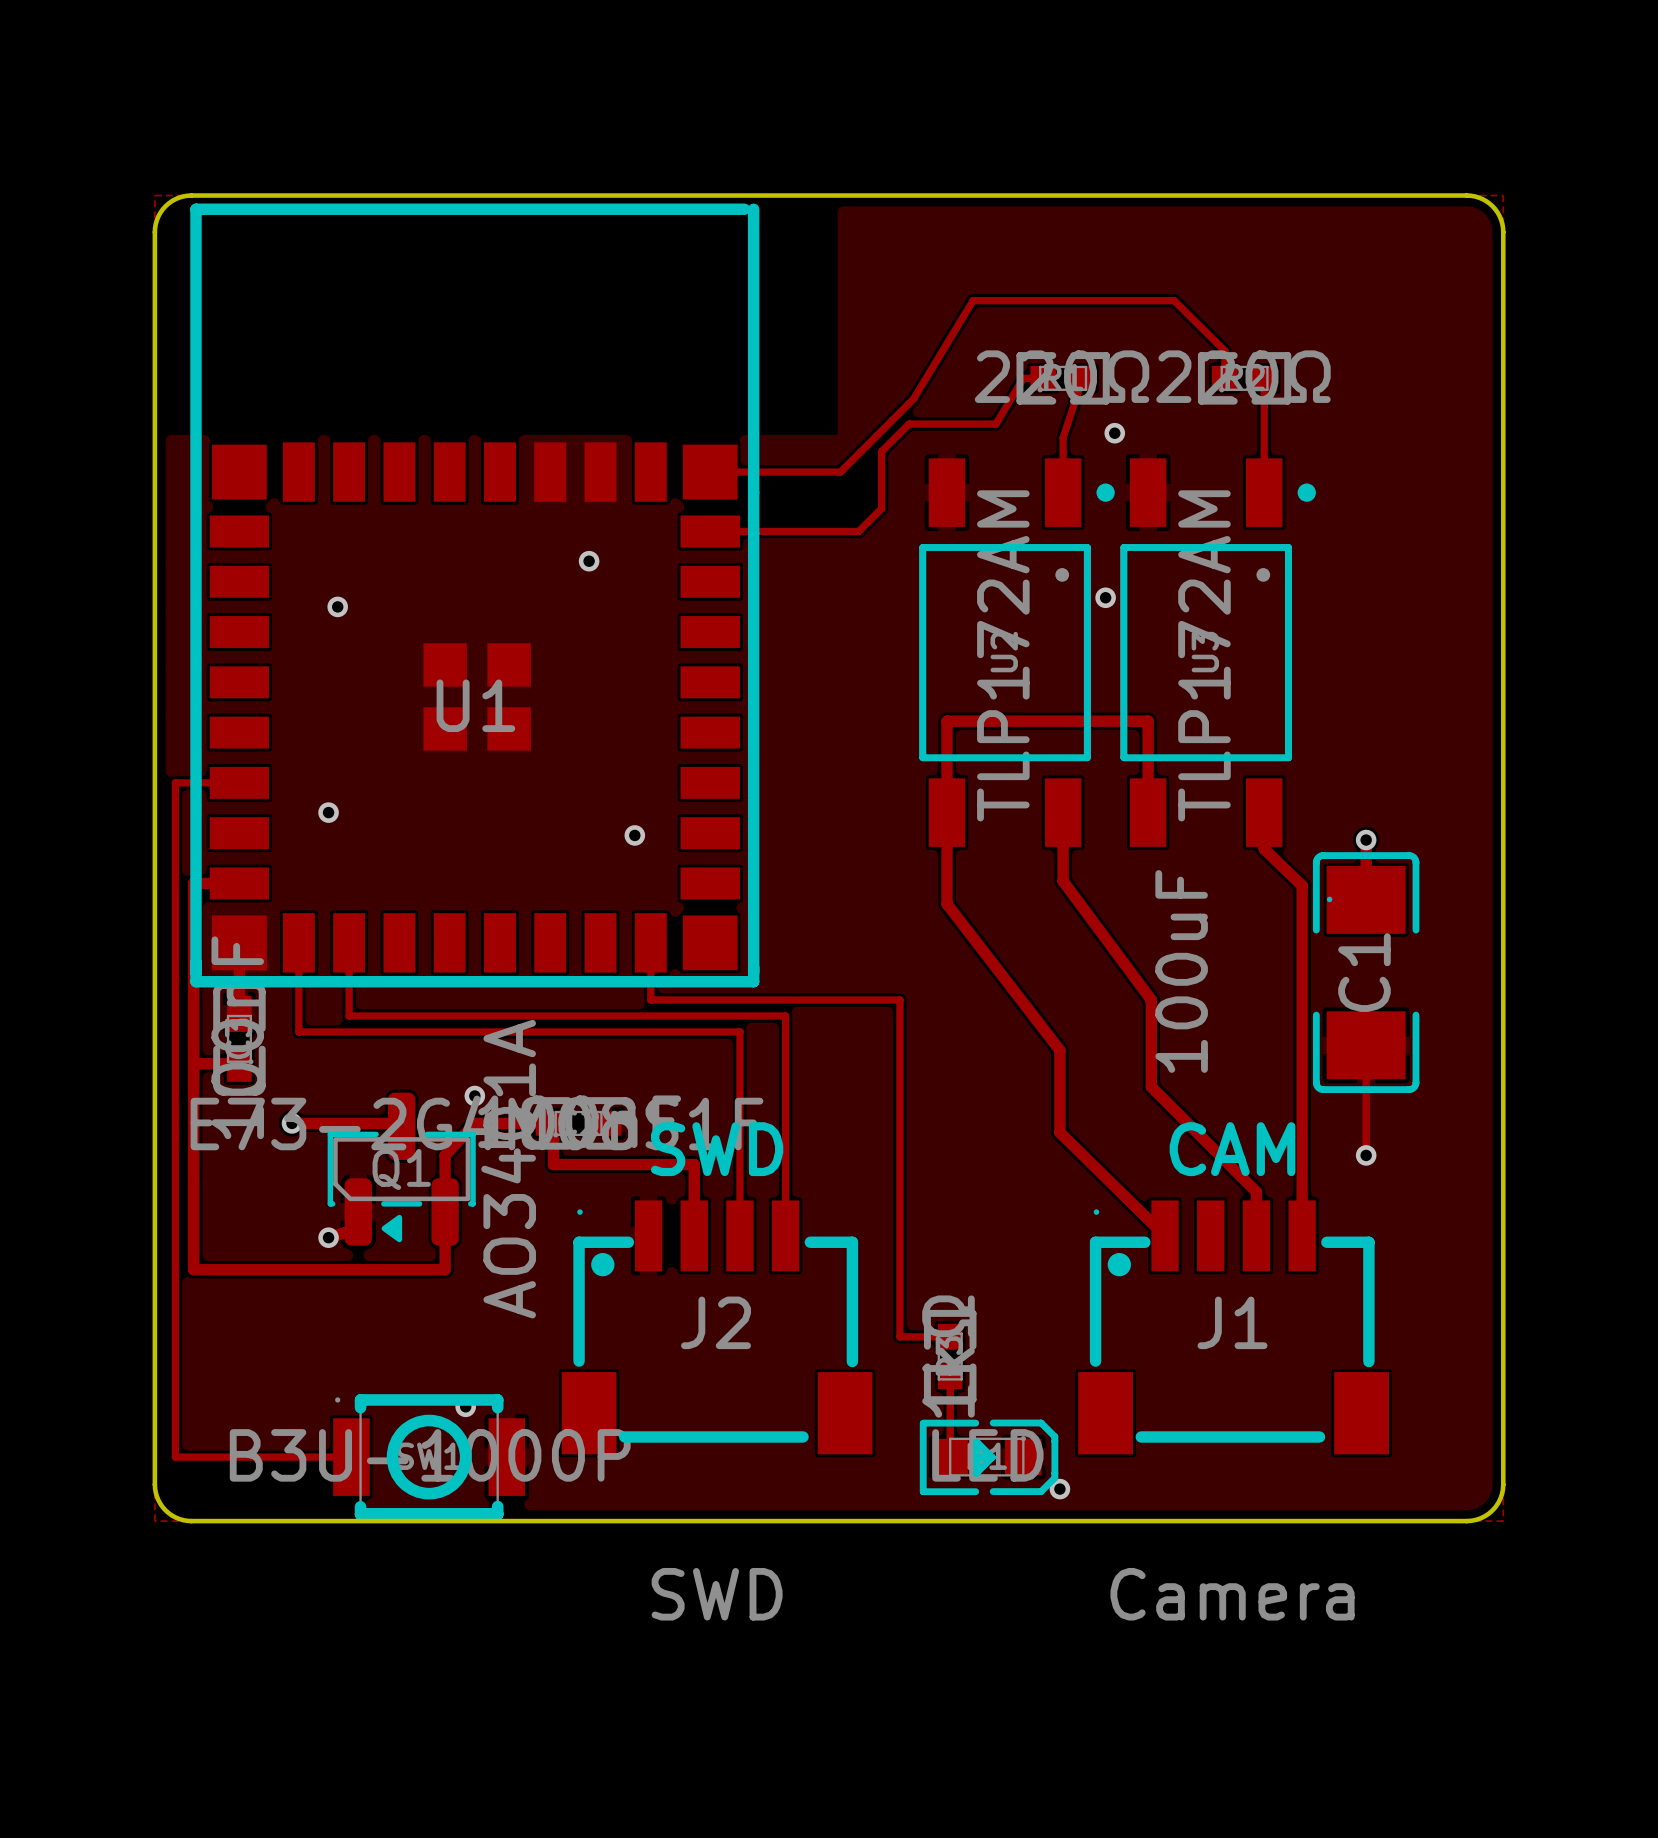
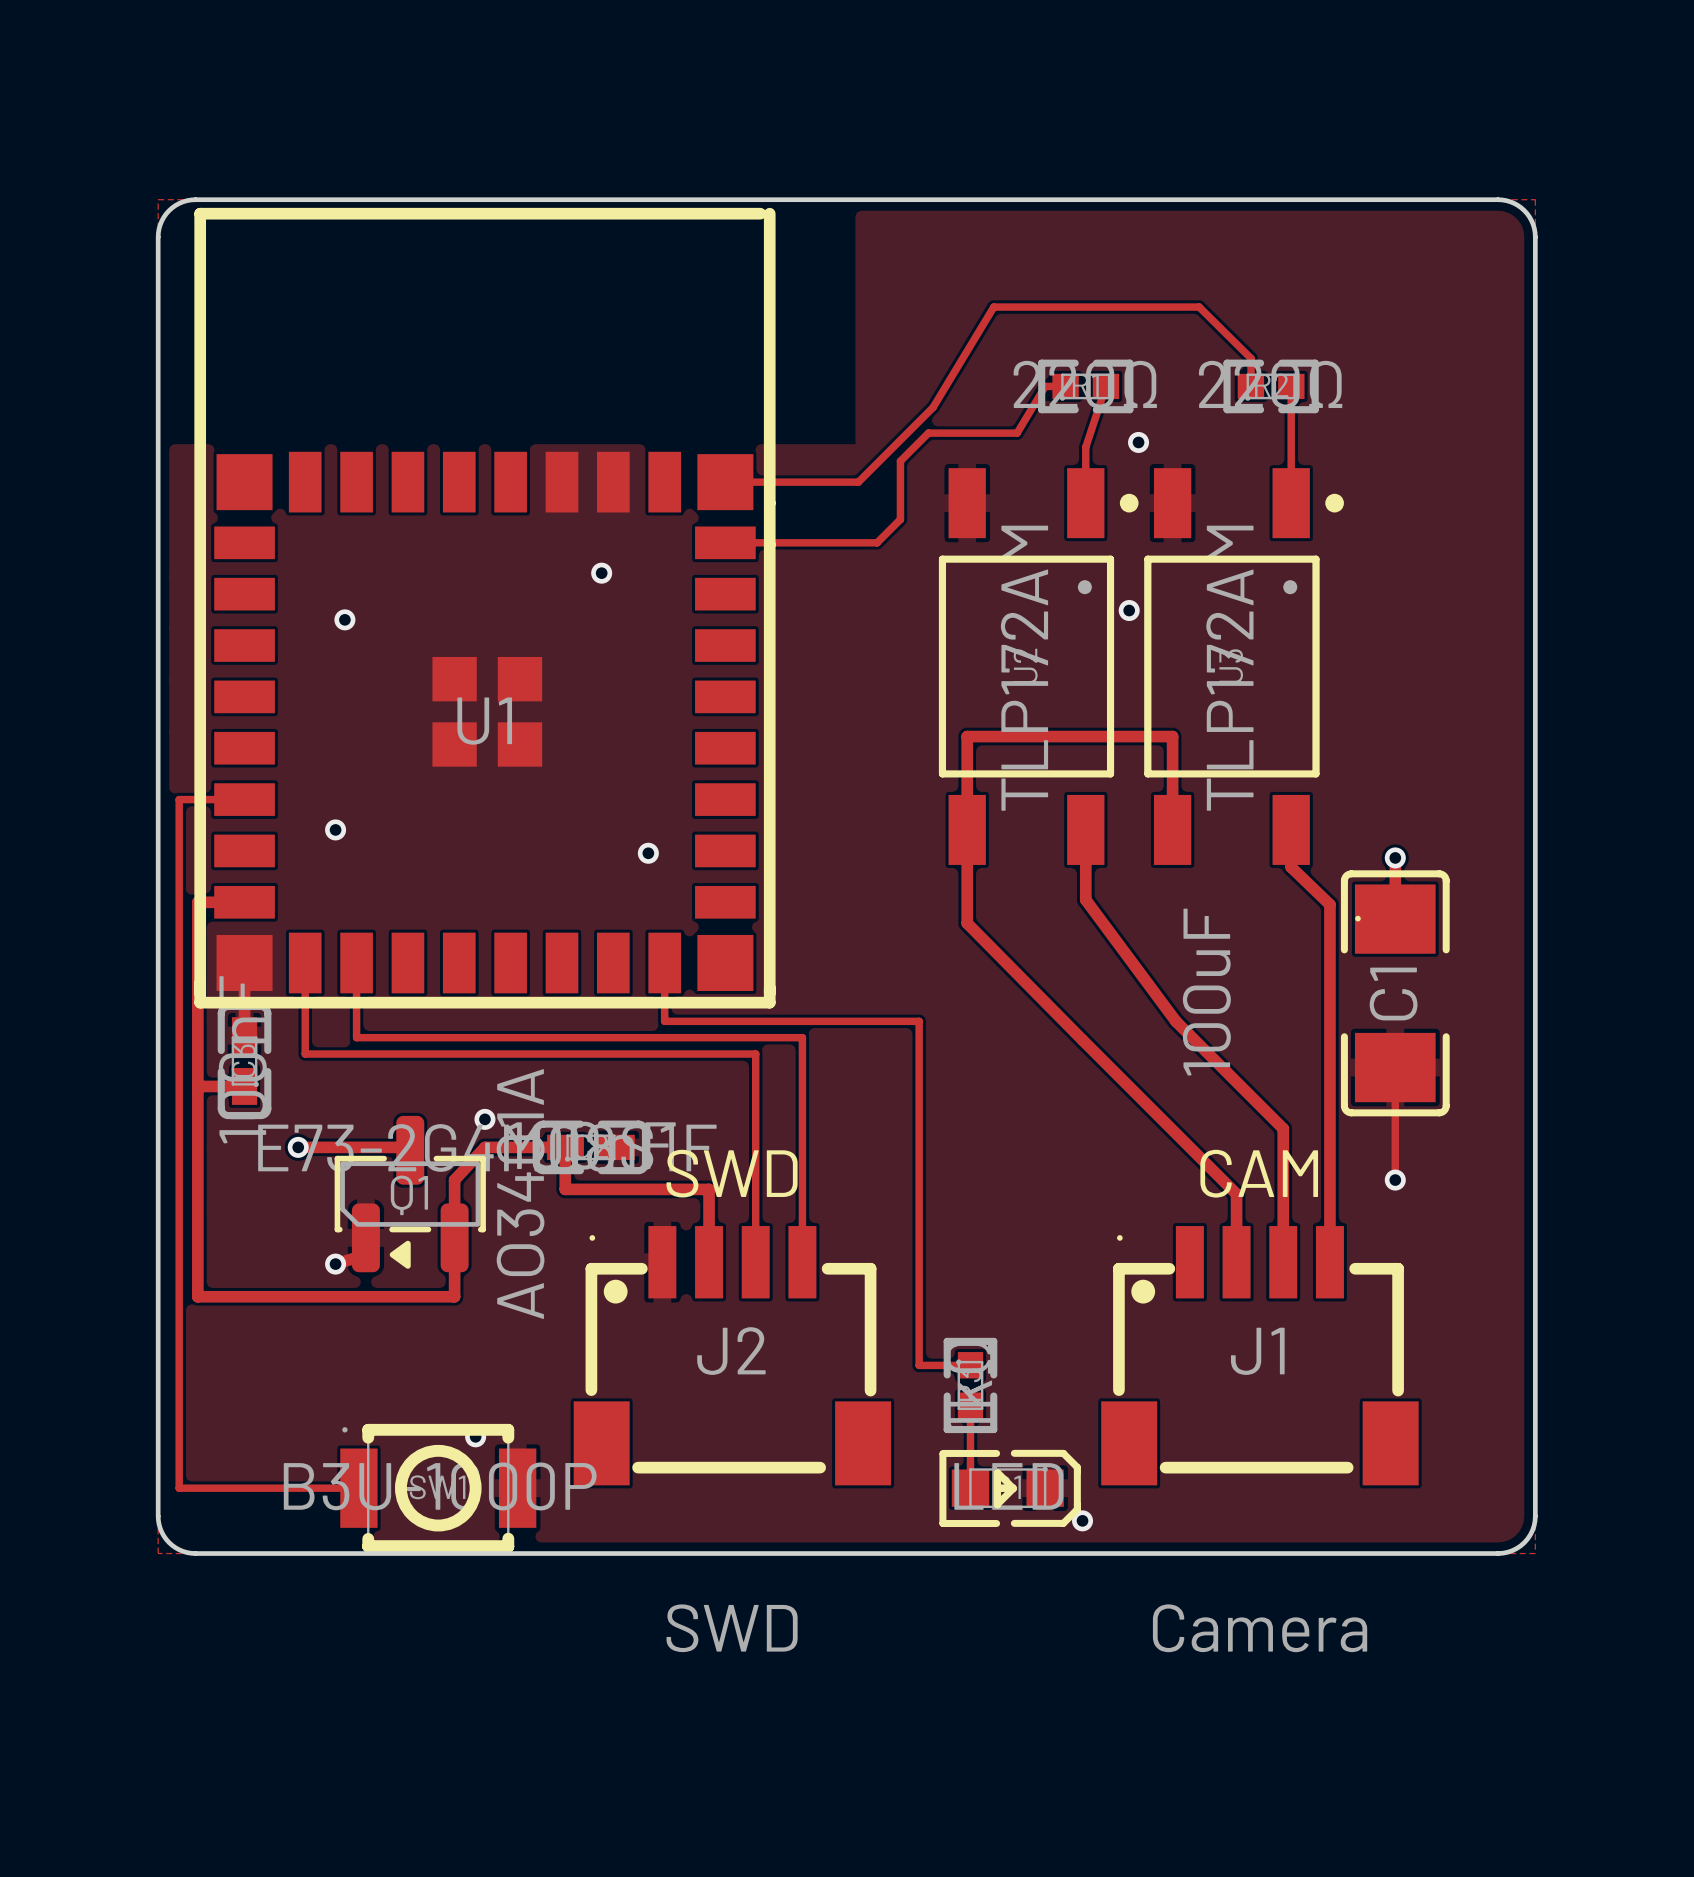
track: (947, 904) (1059, 1050) (1059, 1132) (1165, 1235) -> (967, 923) (1236, 1194) (1236, 1262)
track: (1151, 1000) (1151, 1086) (1256, 1191) -> (1175, 1021) (1283, 1128) (1283, 1217)

